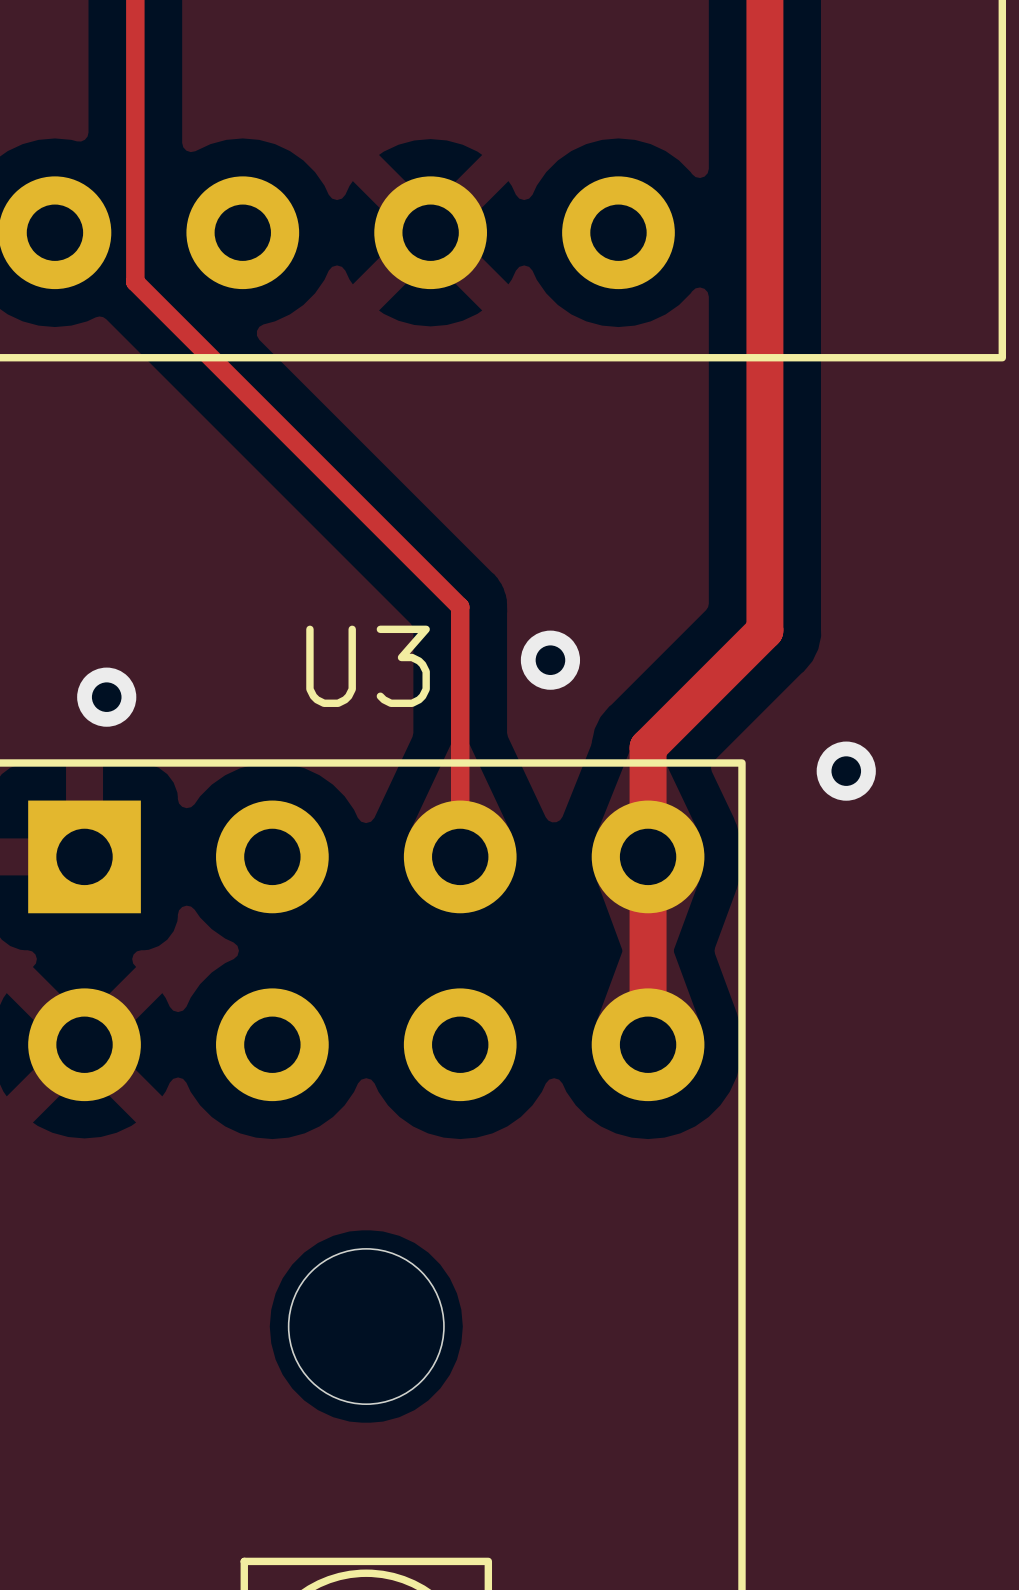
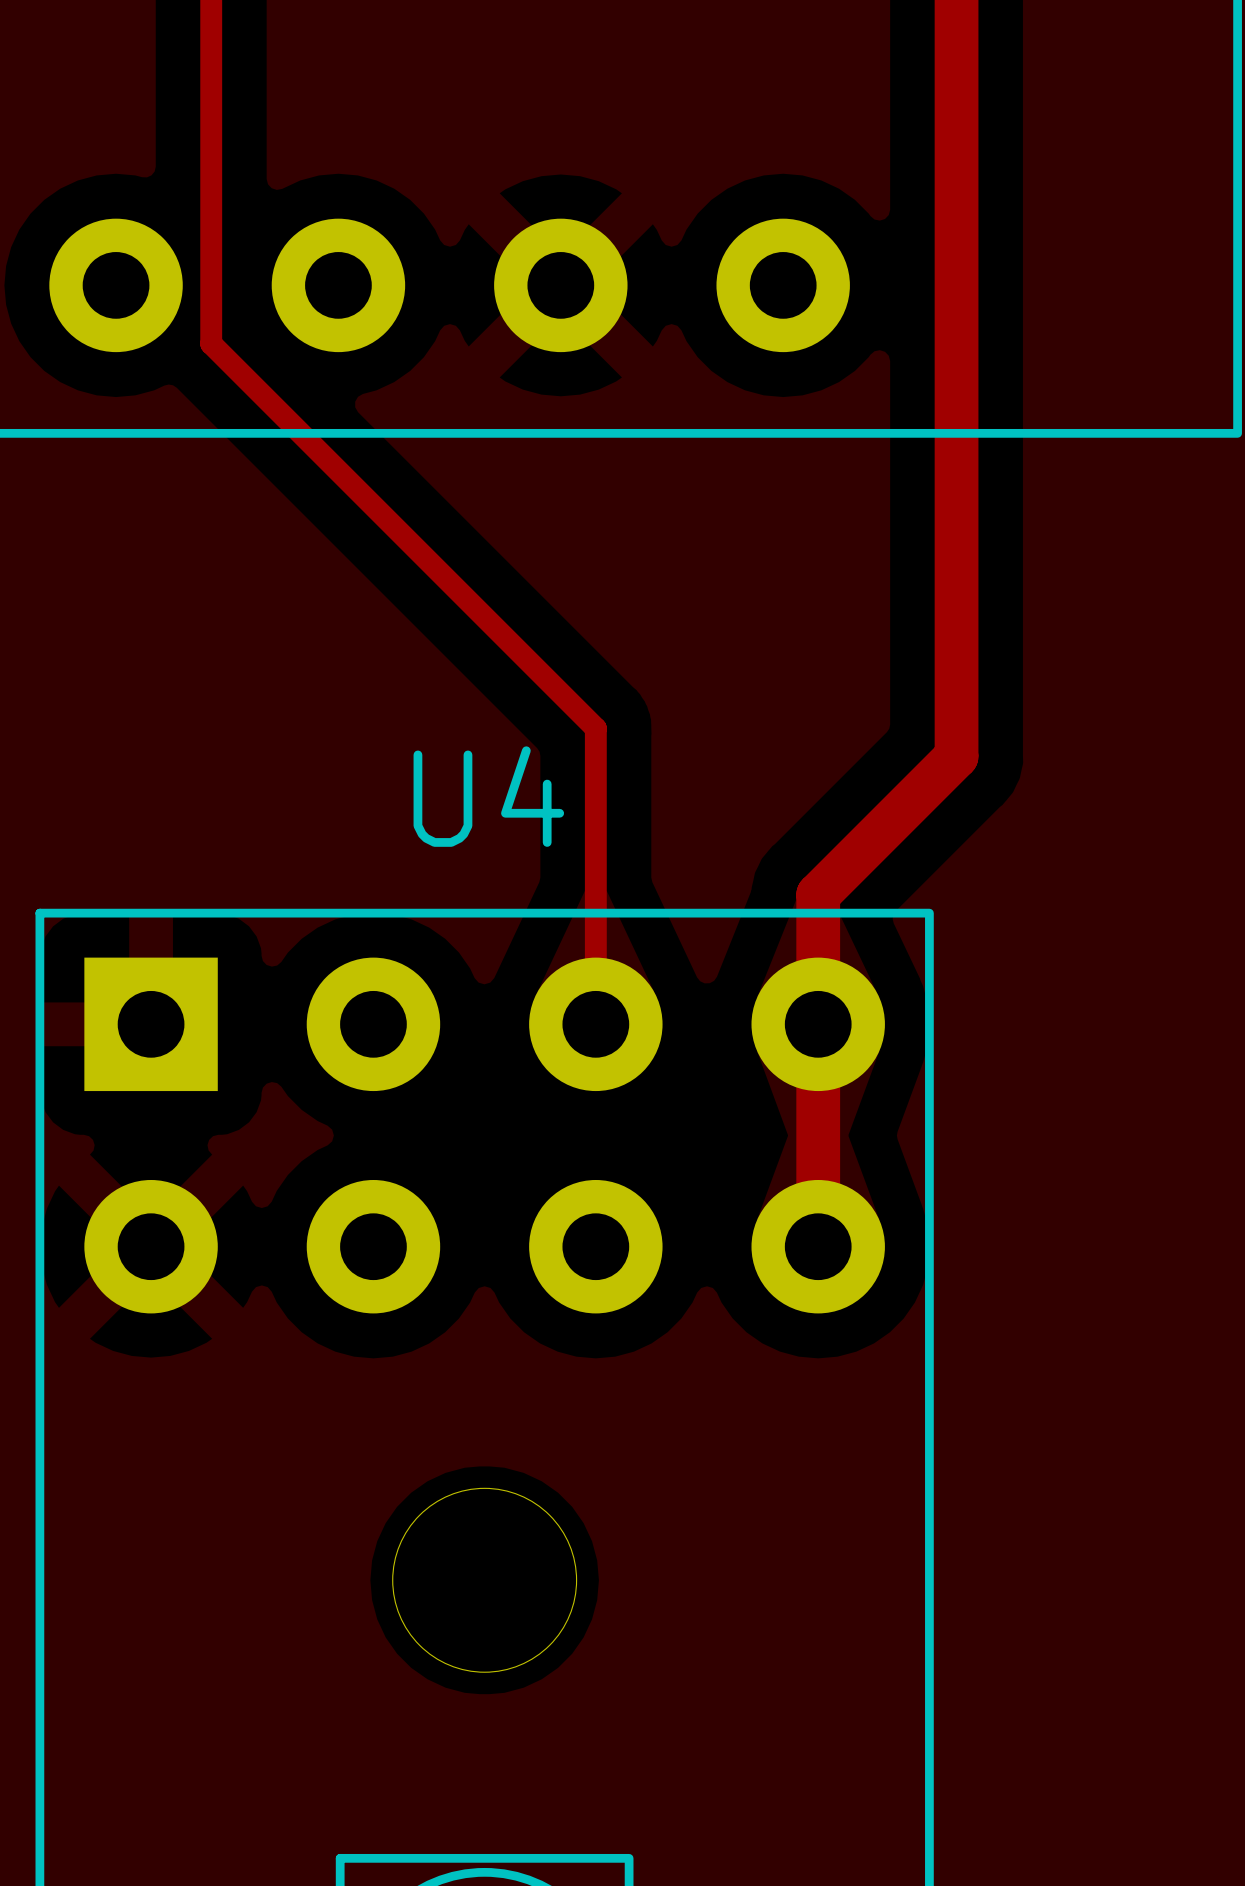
via: (550, 660) -> none
U3 name: U3 (368, 666) -> U4 (488, 796)
via: (106, 697) -> none
via: (846, 771) -> none

